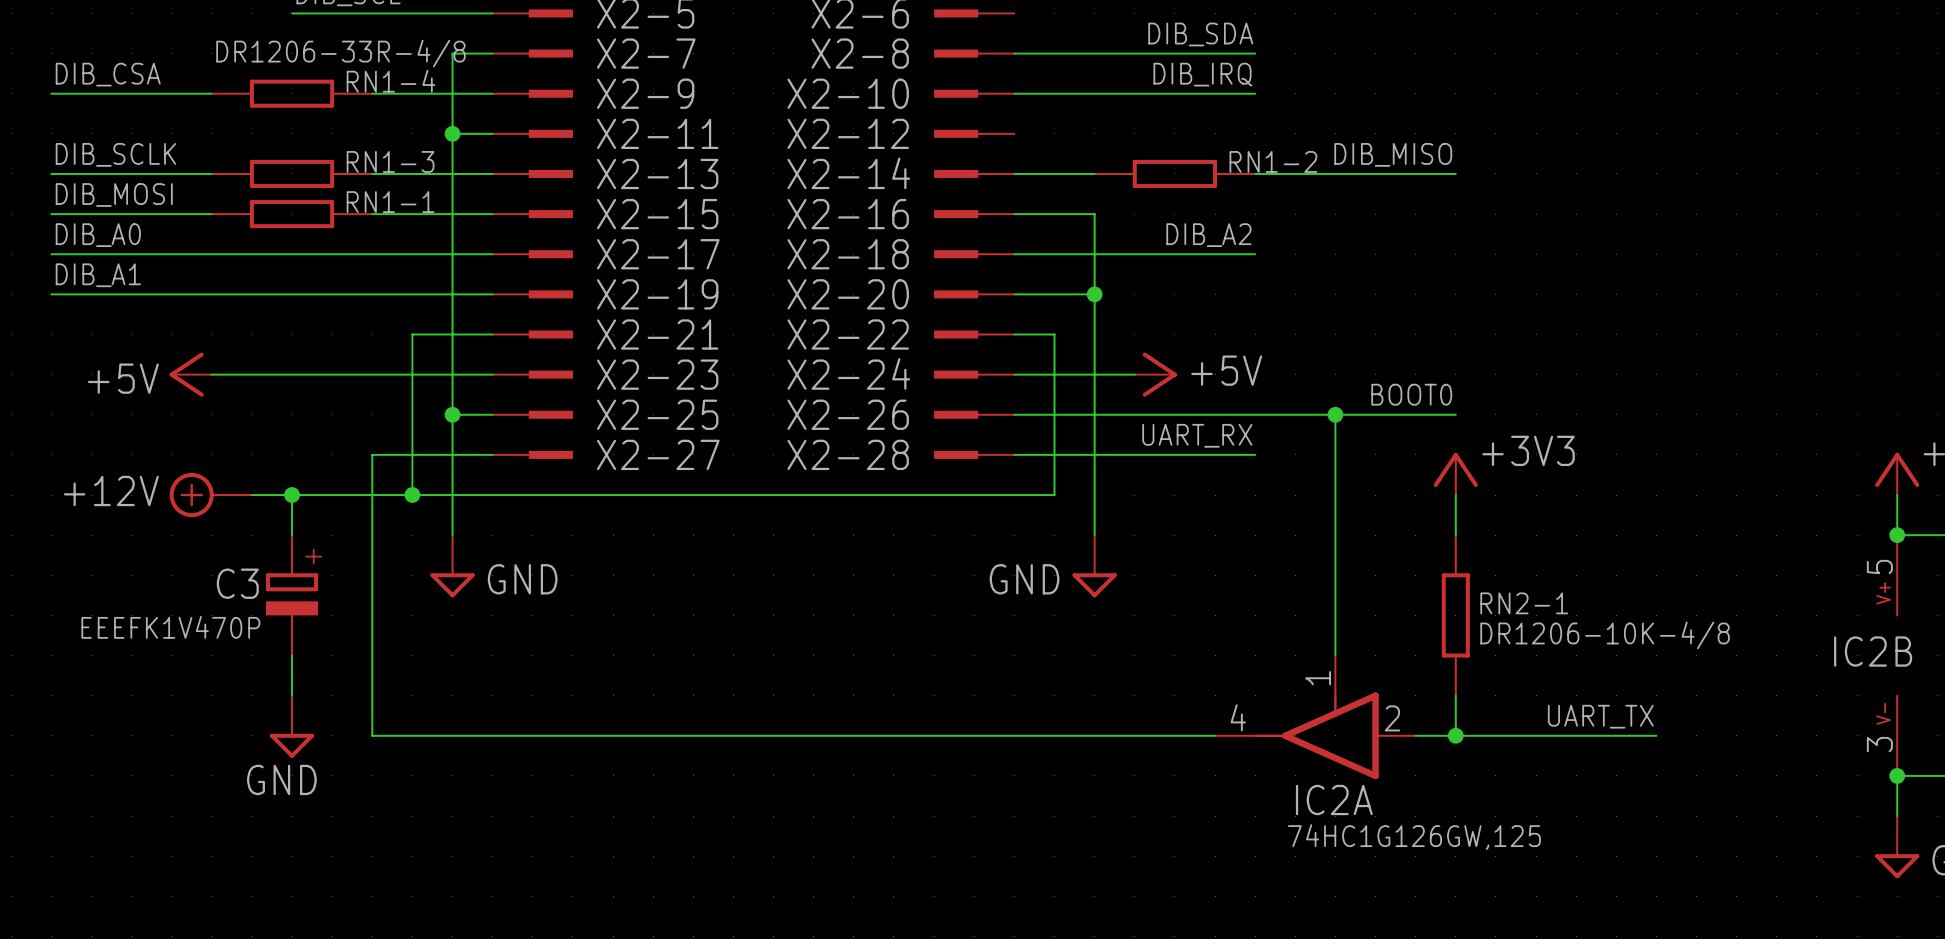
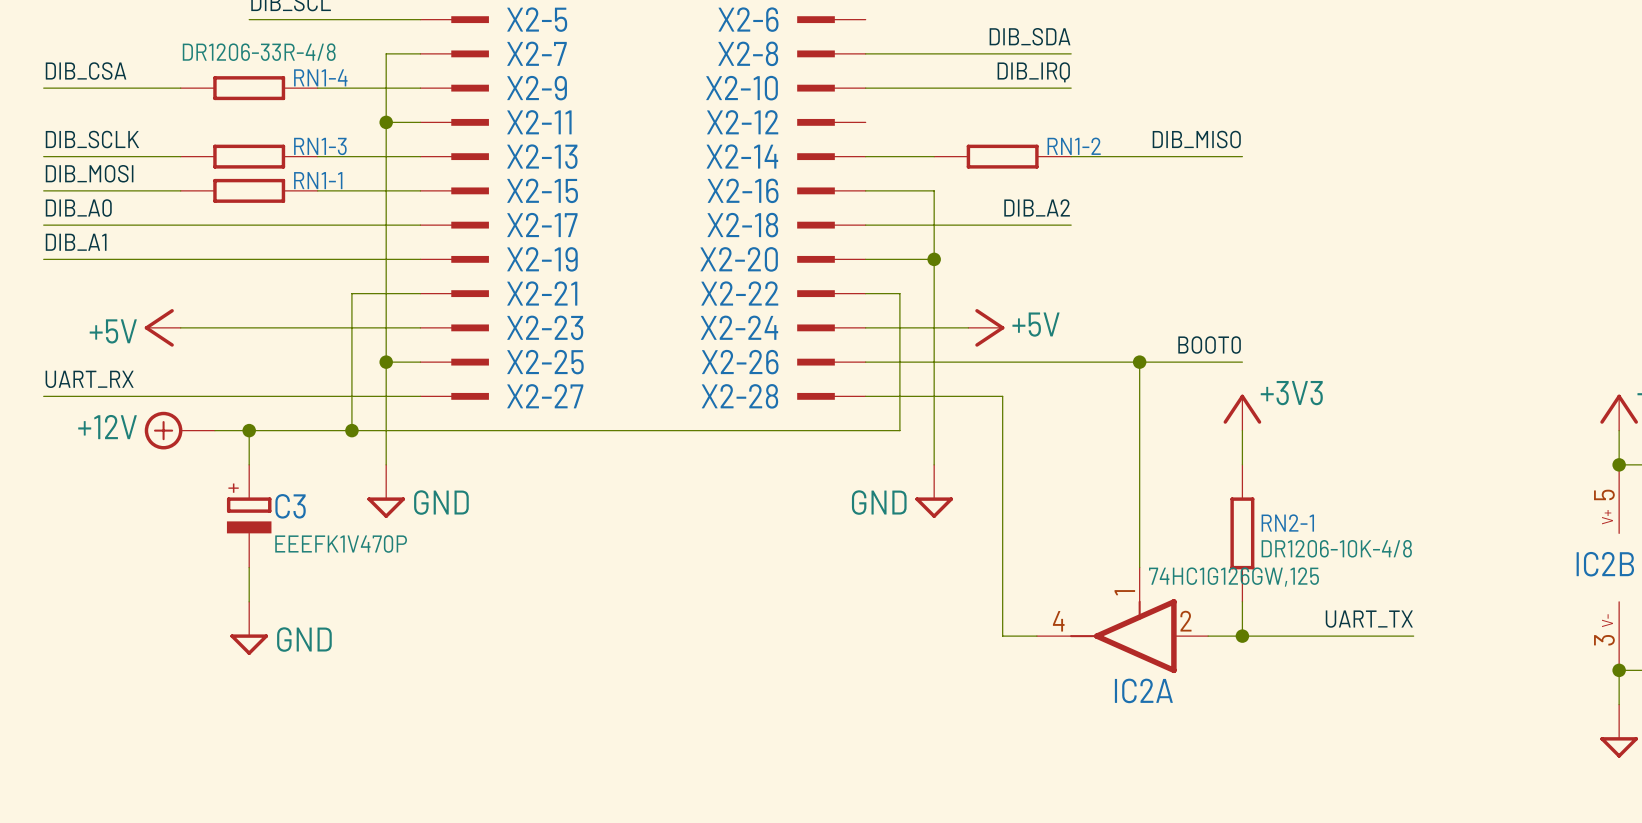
label: none -> UART_RX (89, 379)
label: UART_RX (1197, 435) -> none
wire: (372, 454) (372, 735) (1174, 735) -> (317, 396) (43, 396)
wire: (1174, 454) (1255, 454) -> (1002, 396) (1002, 636)
C3 text position: + (313, 556) -> + (233, 488)
C3 name position: C3 (237, 583) -> C3 (290, 506)
C3 value position: EEEFK1V470P (170, 627) -> EEEFK1V470P (341, 543)
power symbol text position: GND (281, 779) -> GND (304, 639)
IC2A value position: 74HC1G126GW,125 (1414, 837) -> 74HC1G126GW,125 (1233, 577)

